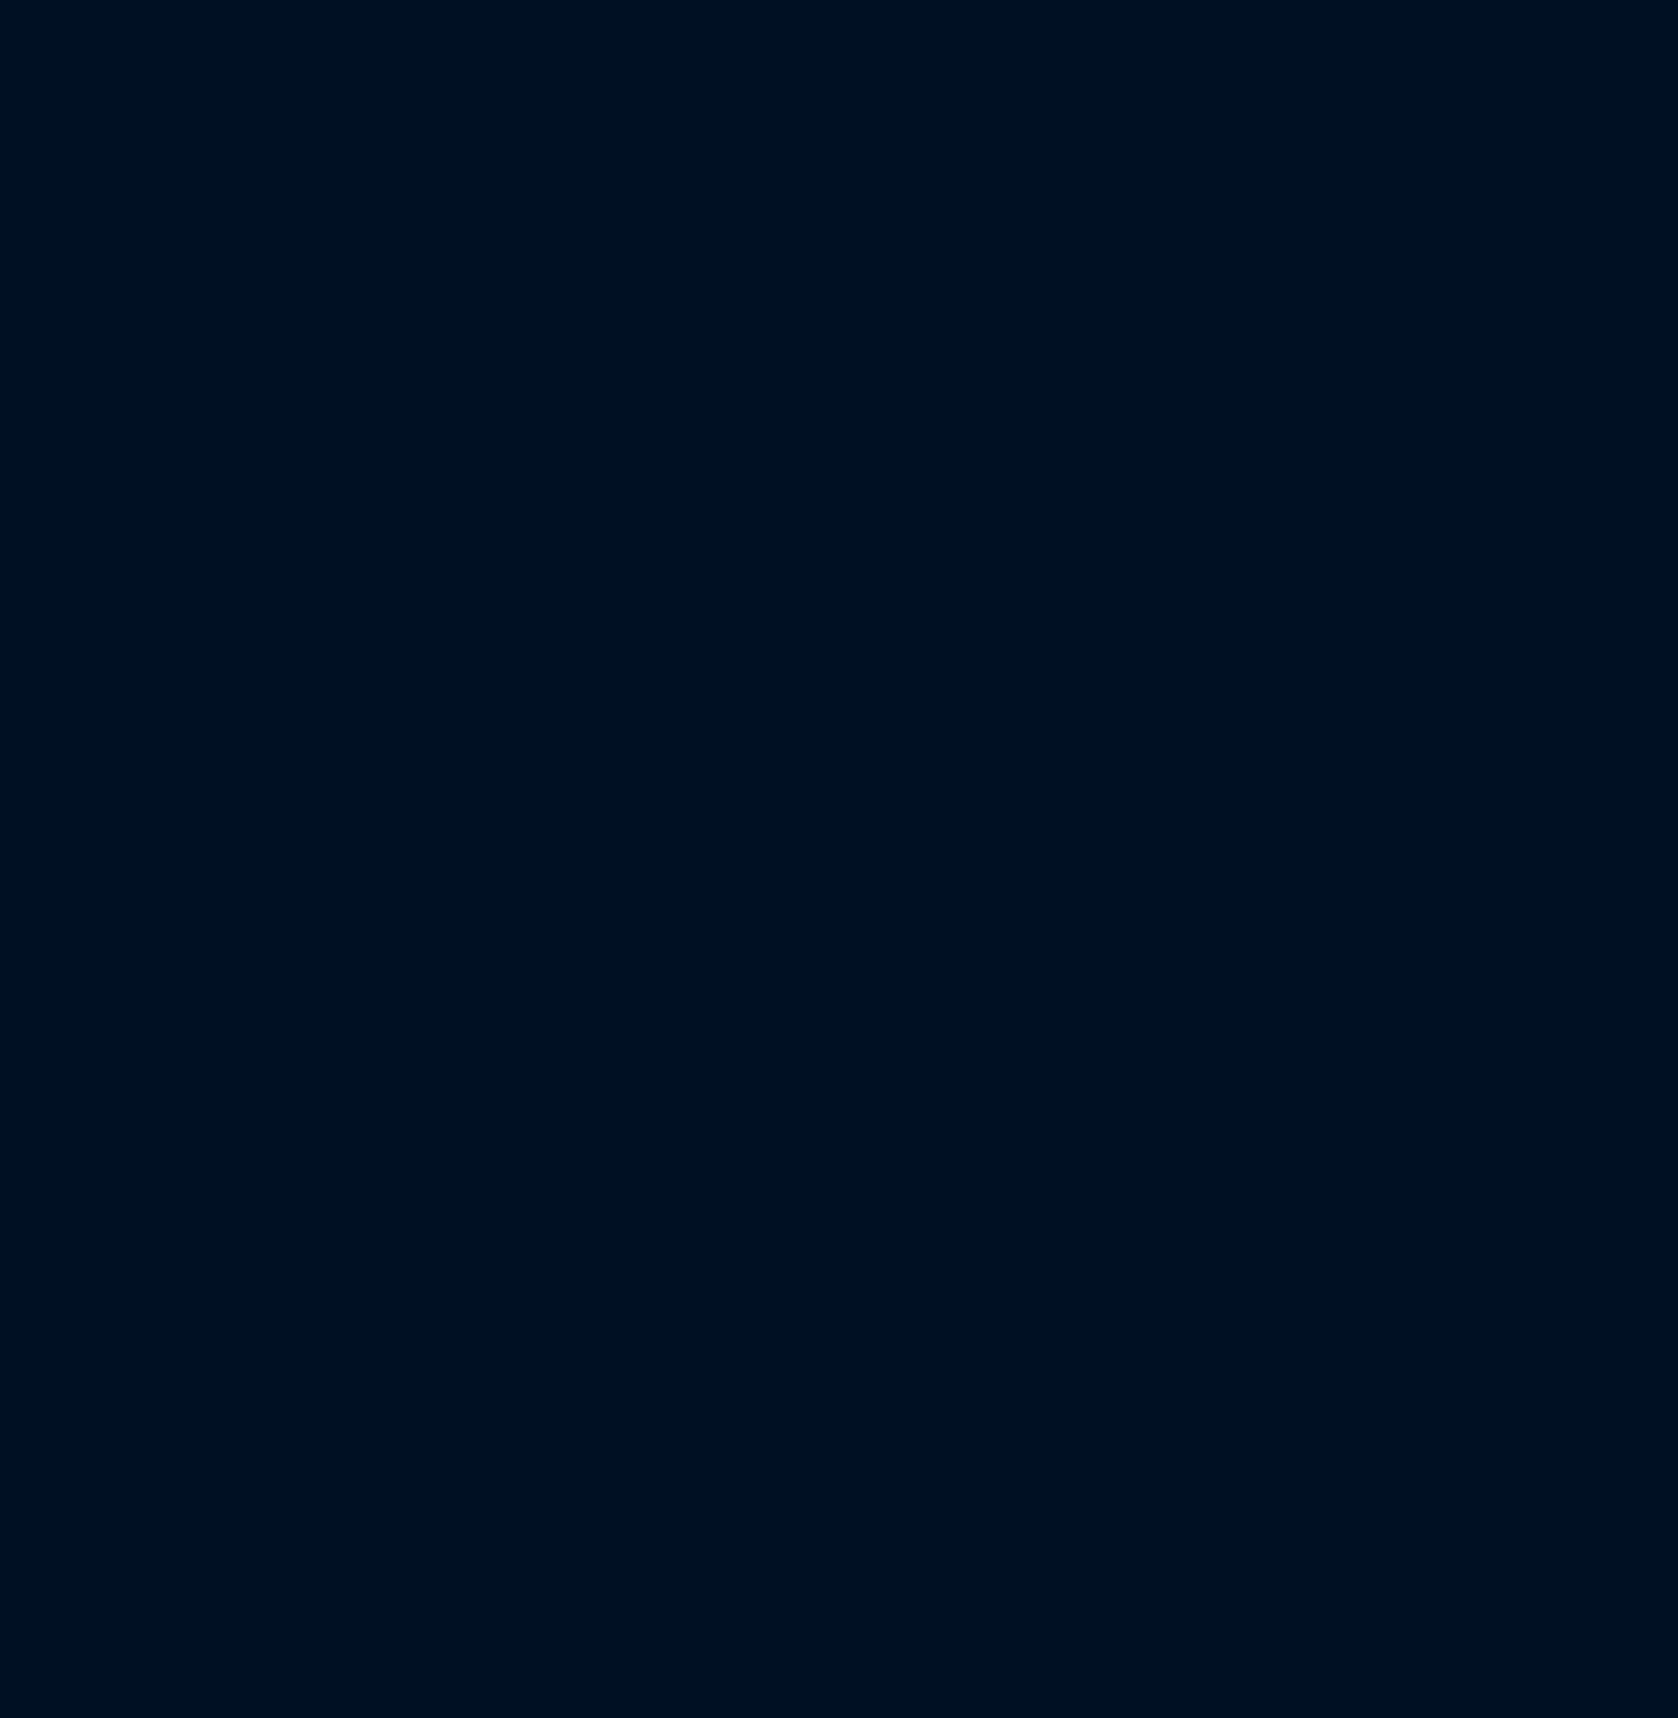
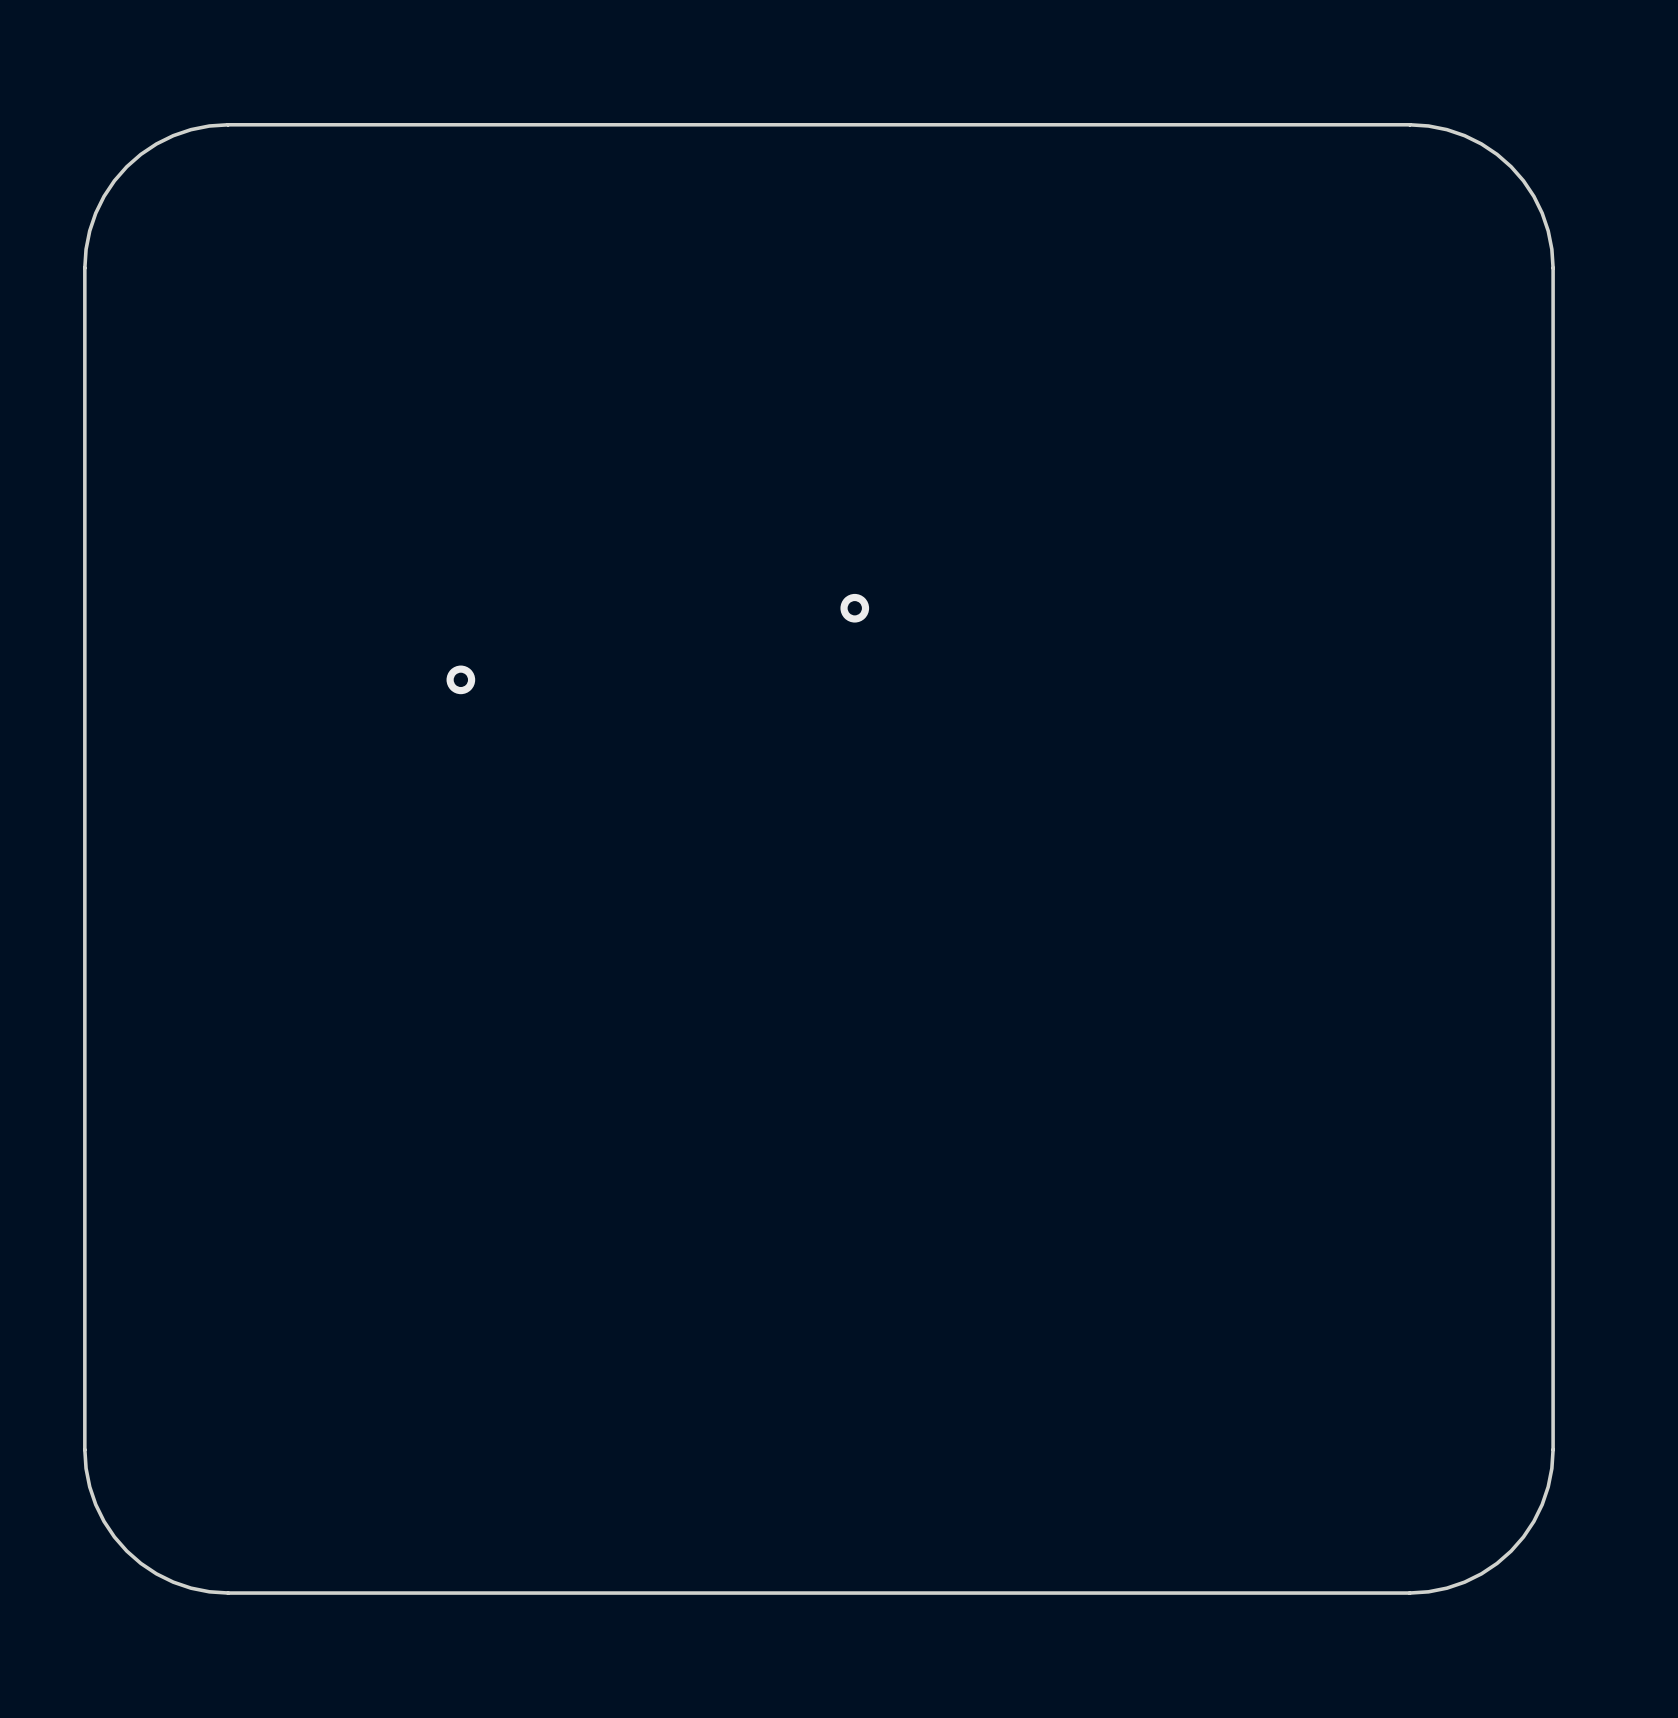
board edge: none -> (1409, 124) (228, 124) (191, 129) (173, 135) (156, 143) (126, 166) (104, 196) (95, 213) (89, 230) (84, 268) (84, 1449) (89, 1486) (95, 1504) (114, 1536) (126, 1551) (140, 1563) (173, 1582) (191, 1588) (228, 1593) (1409, 1593) (1446, 1588) (1464, 1582) (1497, 1563) (1511, 1551) (1523, 1536) (1542, 1504) (1548, 1486) (1553, 1449) (1551, 249) (1542, 213) (1523, 180) (1511, 166) (1497, 154) (1464, 135) (1446, 129) (1409, 124)
via: none -> (854, 608)
via: none -> (460, 679)

